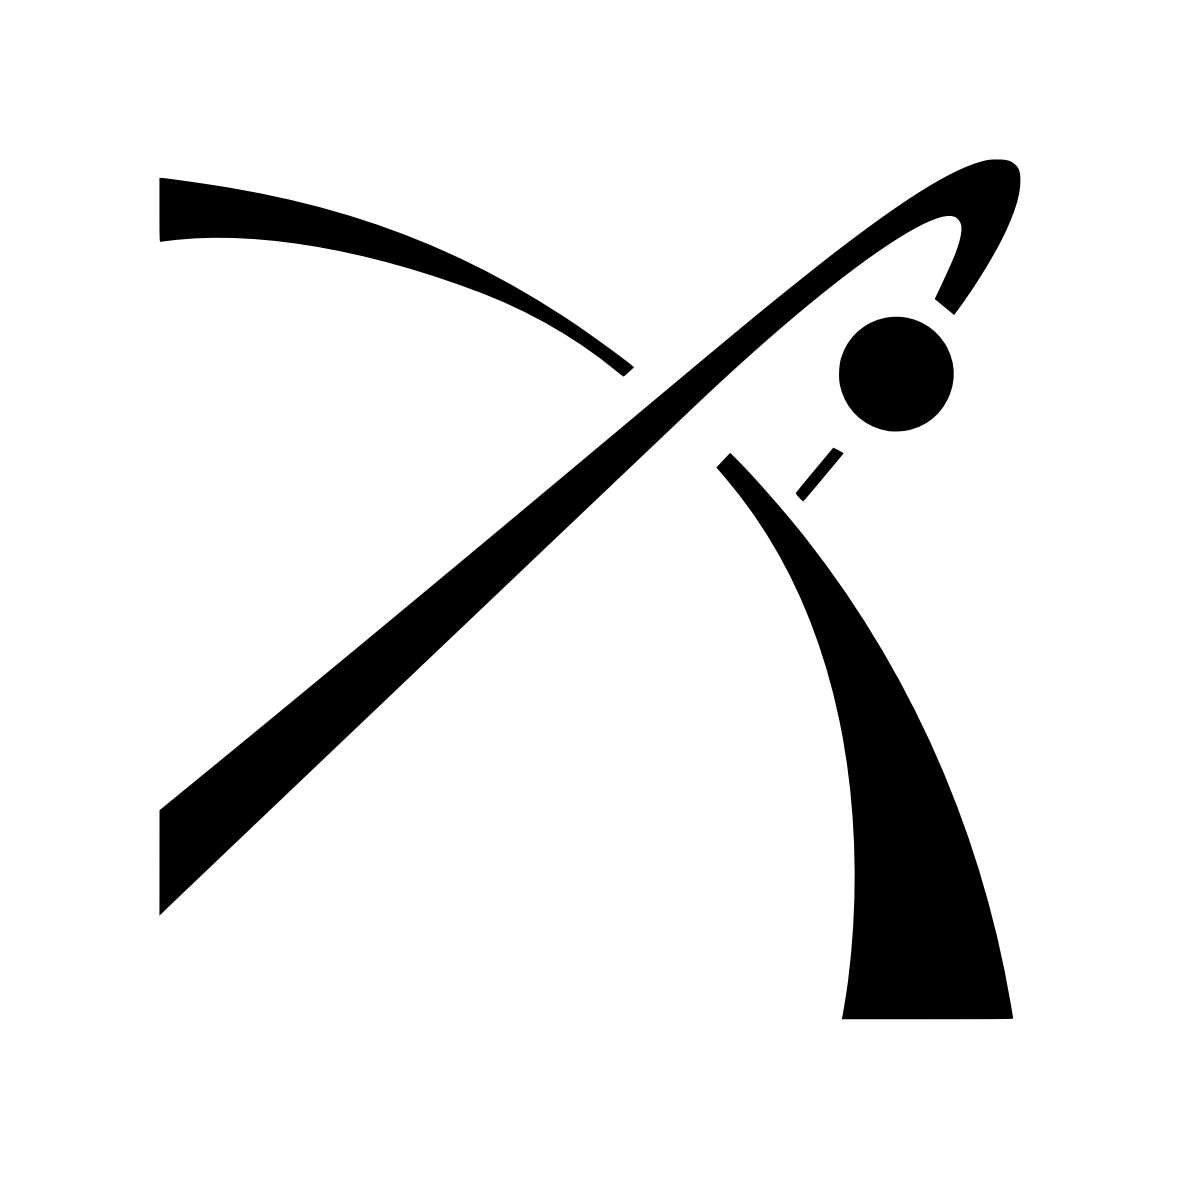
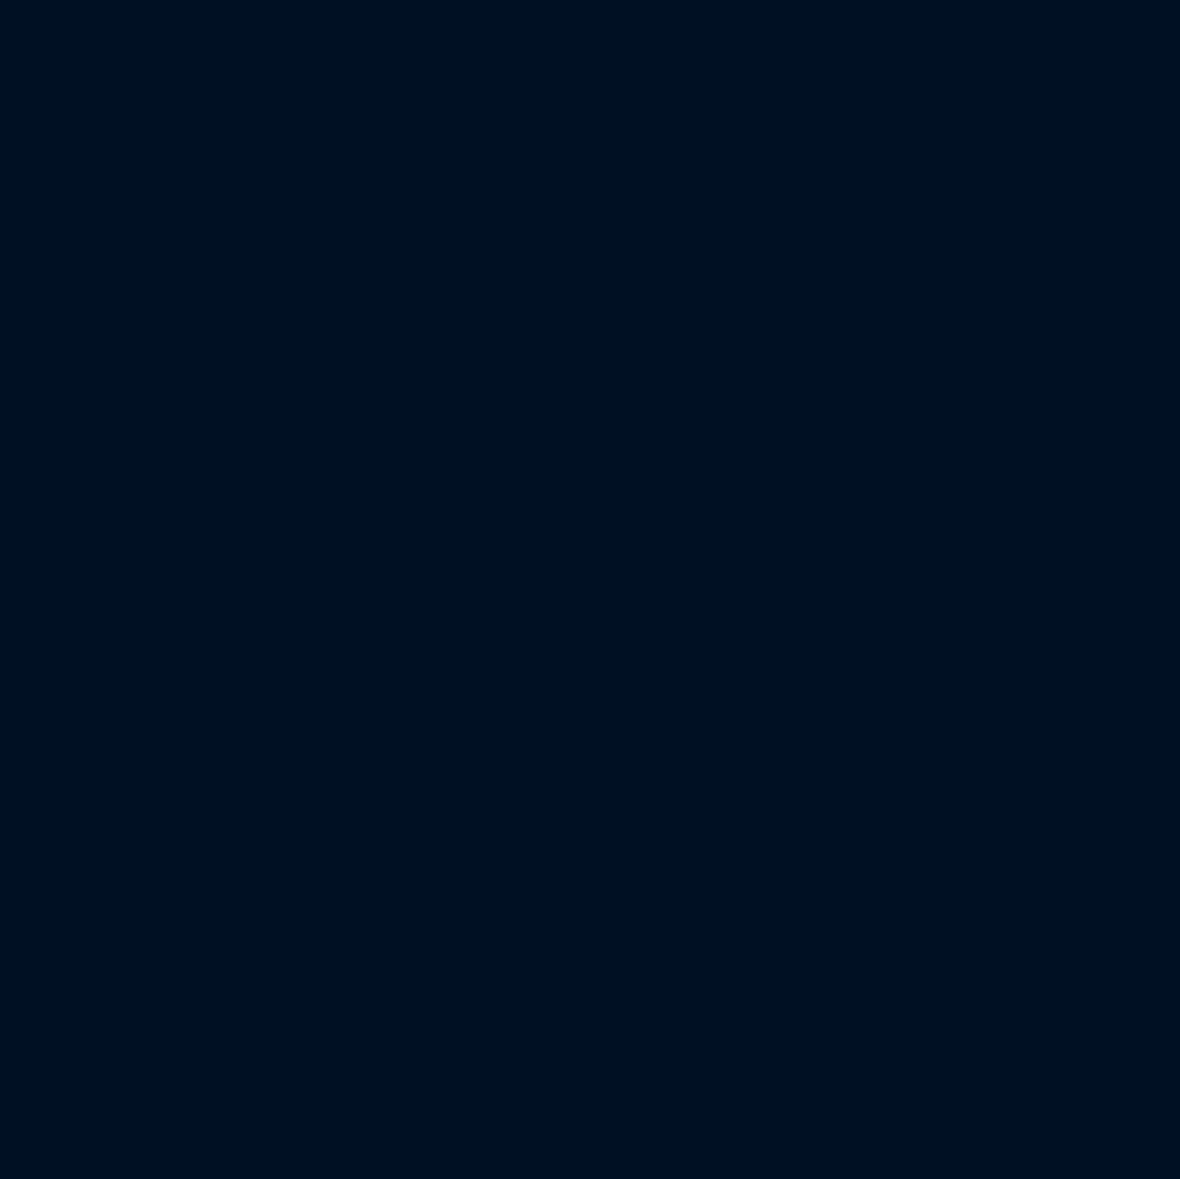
drawing: [159, 159, 1021, 1020] -> none

